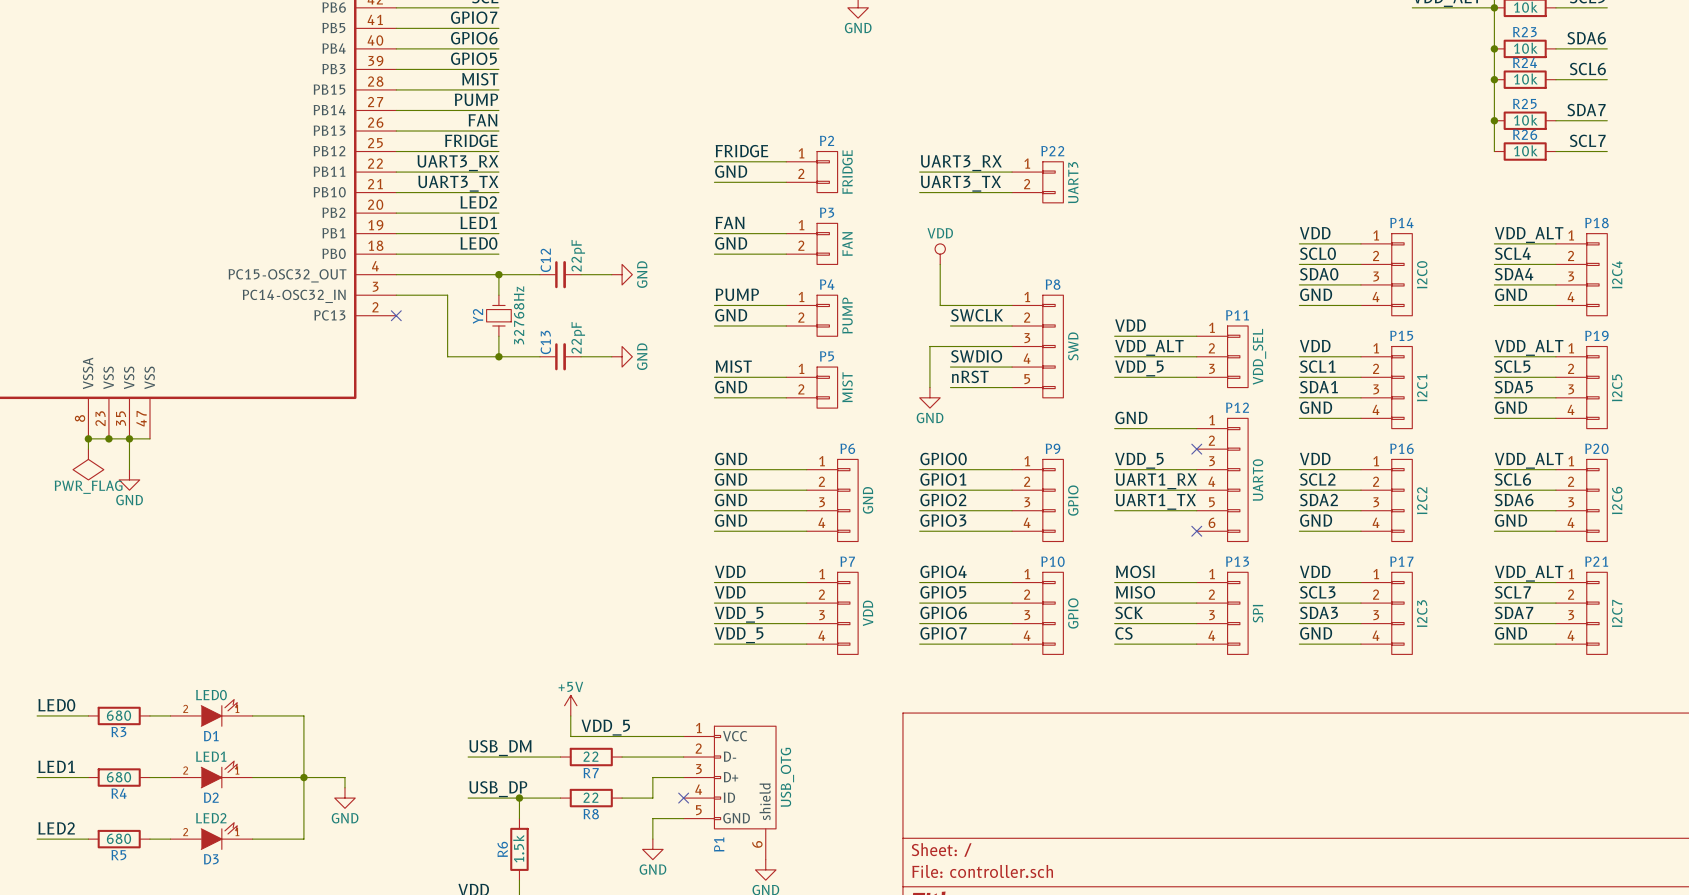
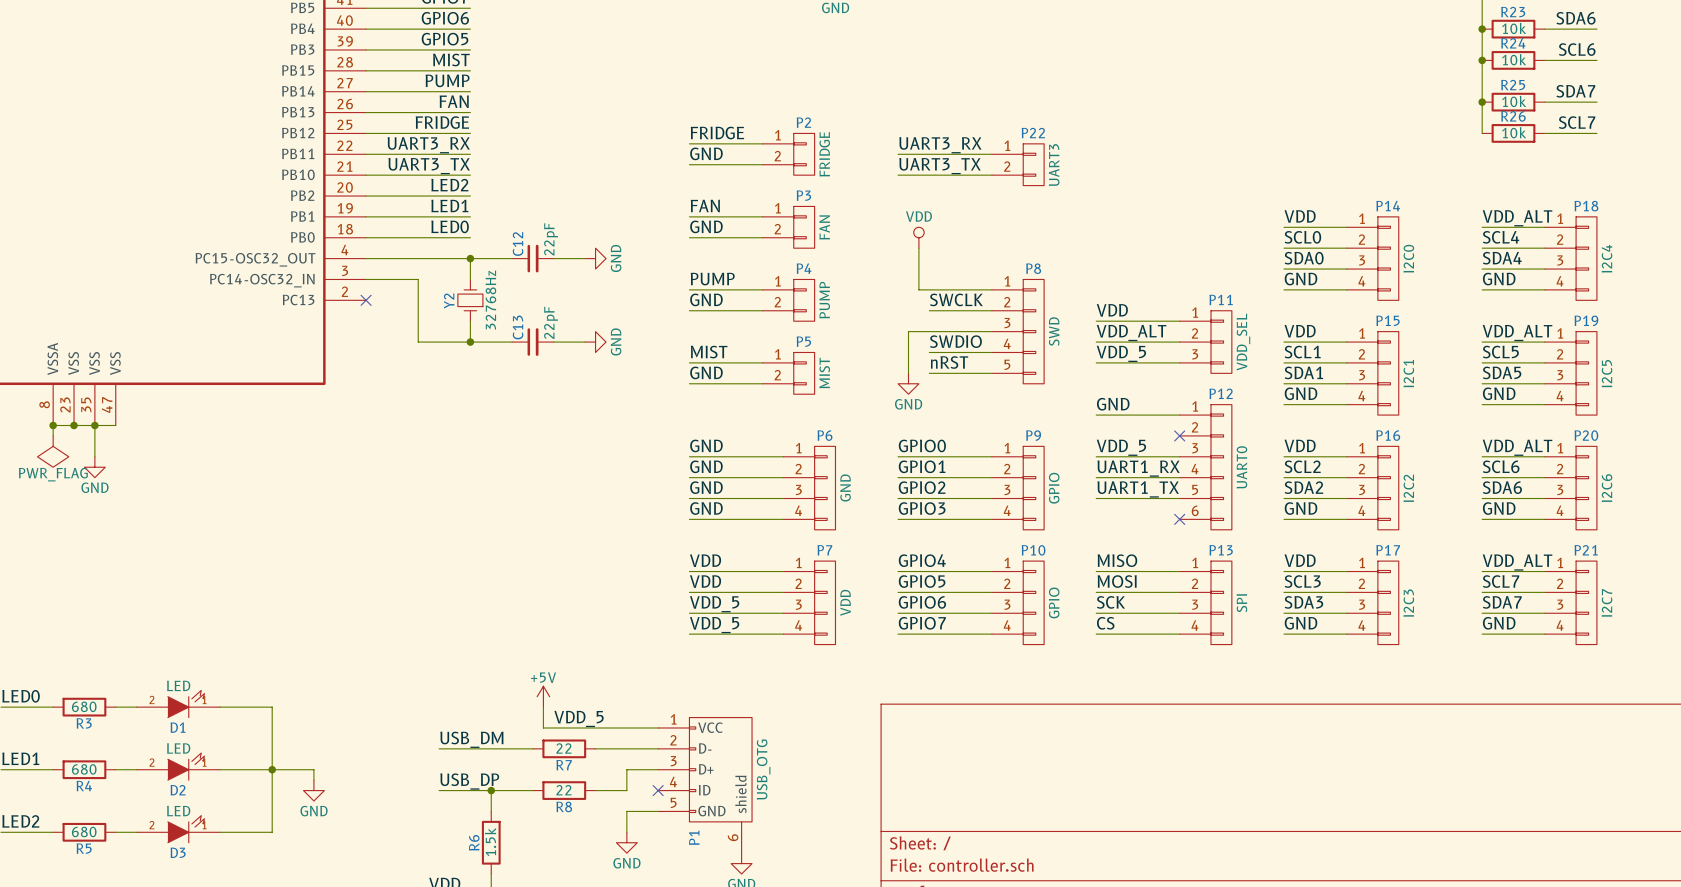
label: MOSI (1135, 571) -> MISO (1117, 560)
label: MISO (1135, 592) -> MOSI (1117, 581)
D1 value: LED0 (211, 695) -> LED (178, 685)
D2 value: LED1 (211, 756) -> LED (178, 748)
D3 value: LED2 (211, 818) -> LED (178, 811)

